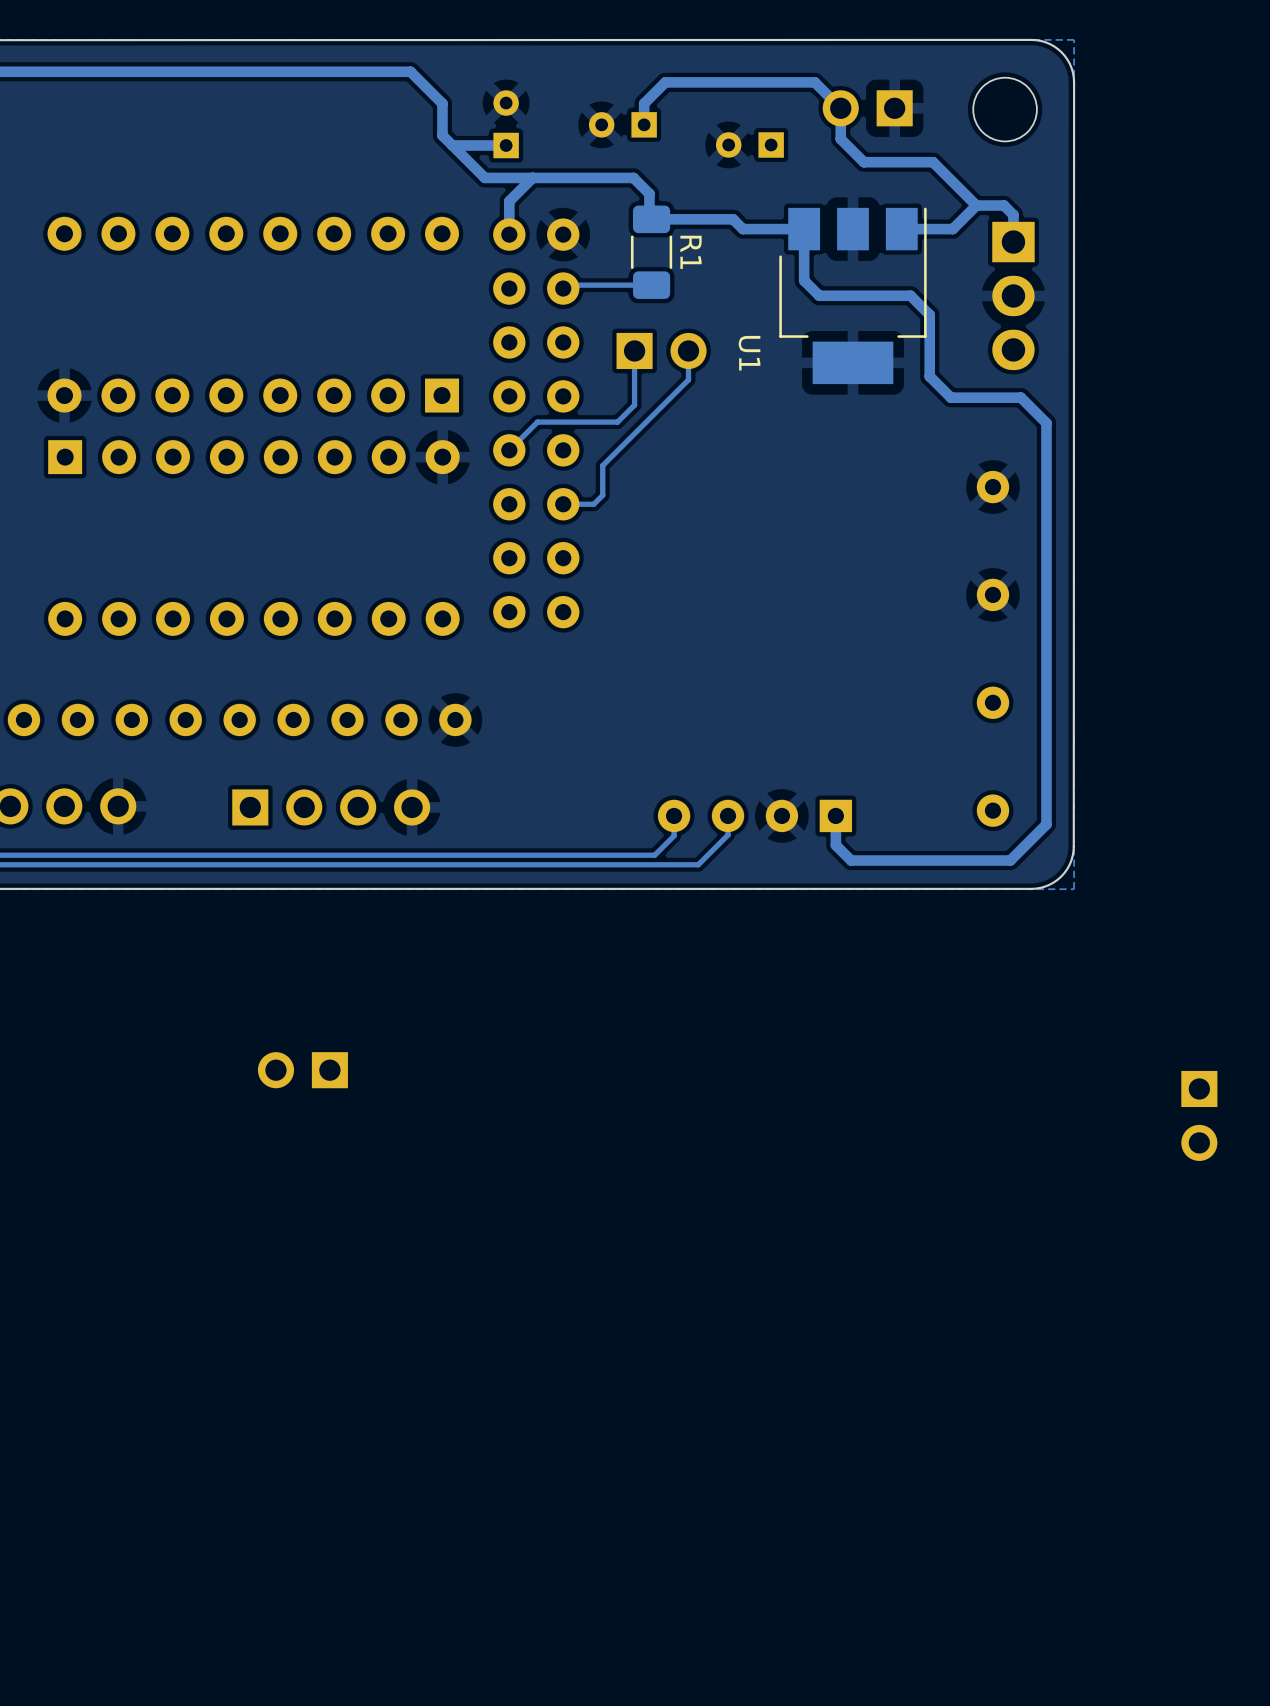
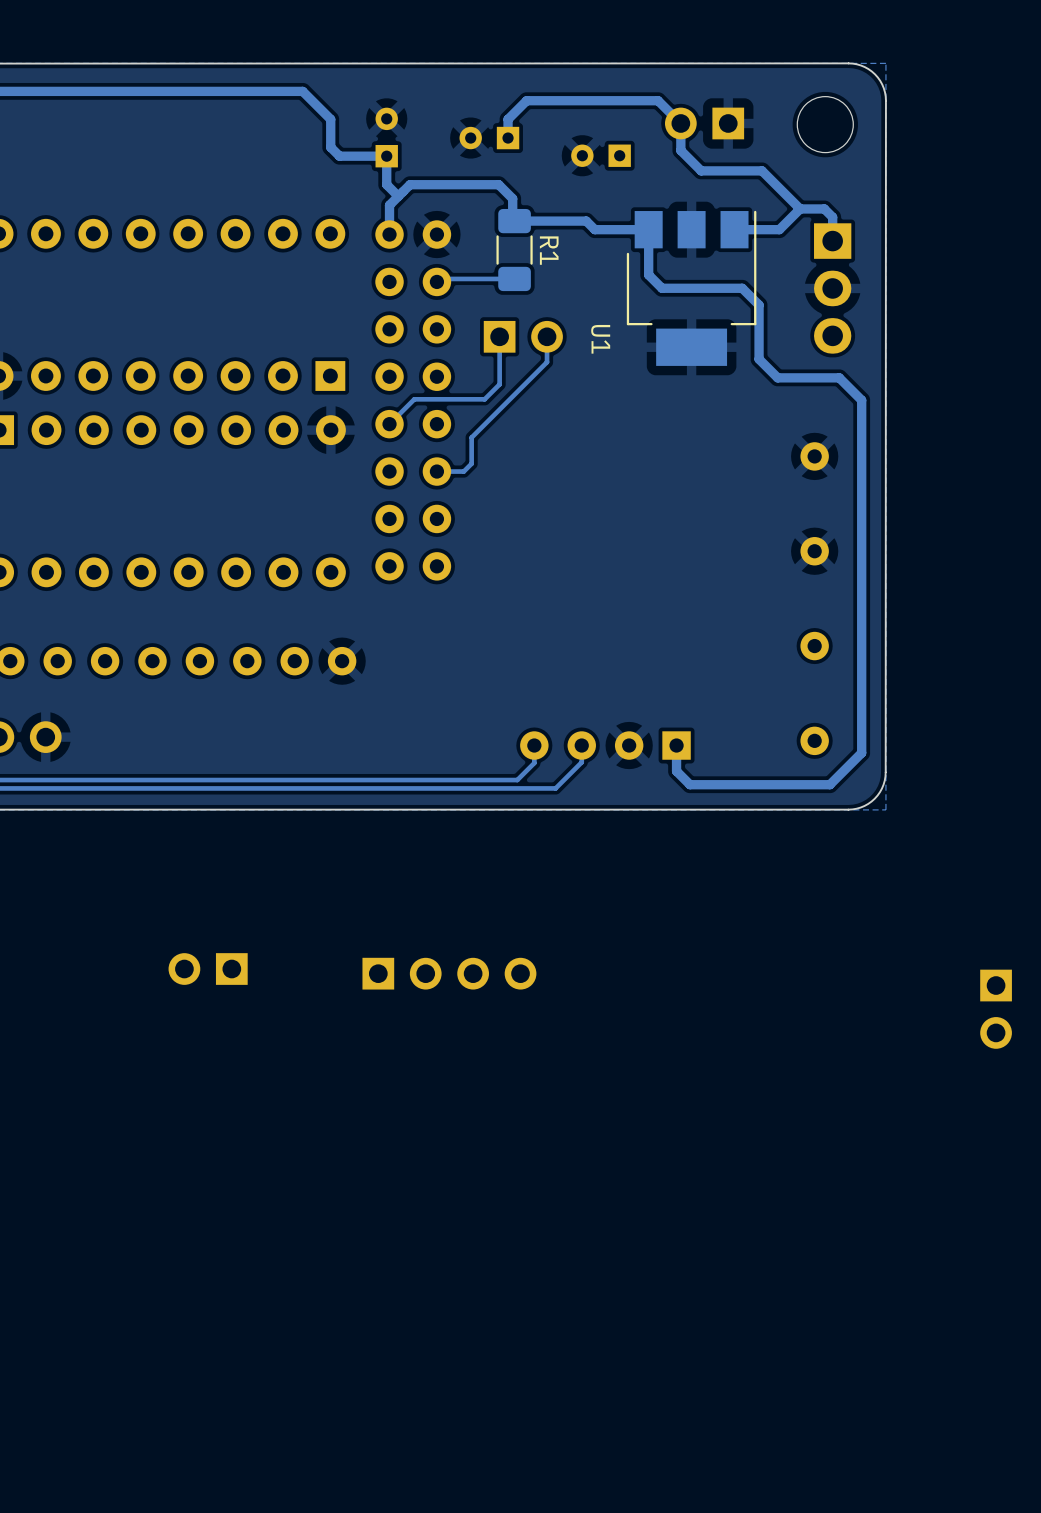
track: (452, 145) (484, 177) (532, 177) -> none
track: none -> (386, 156) (386, 184) (398, 196)
part position: (331, 807) -> (449, 973)

